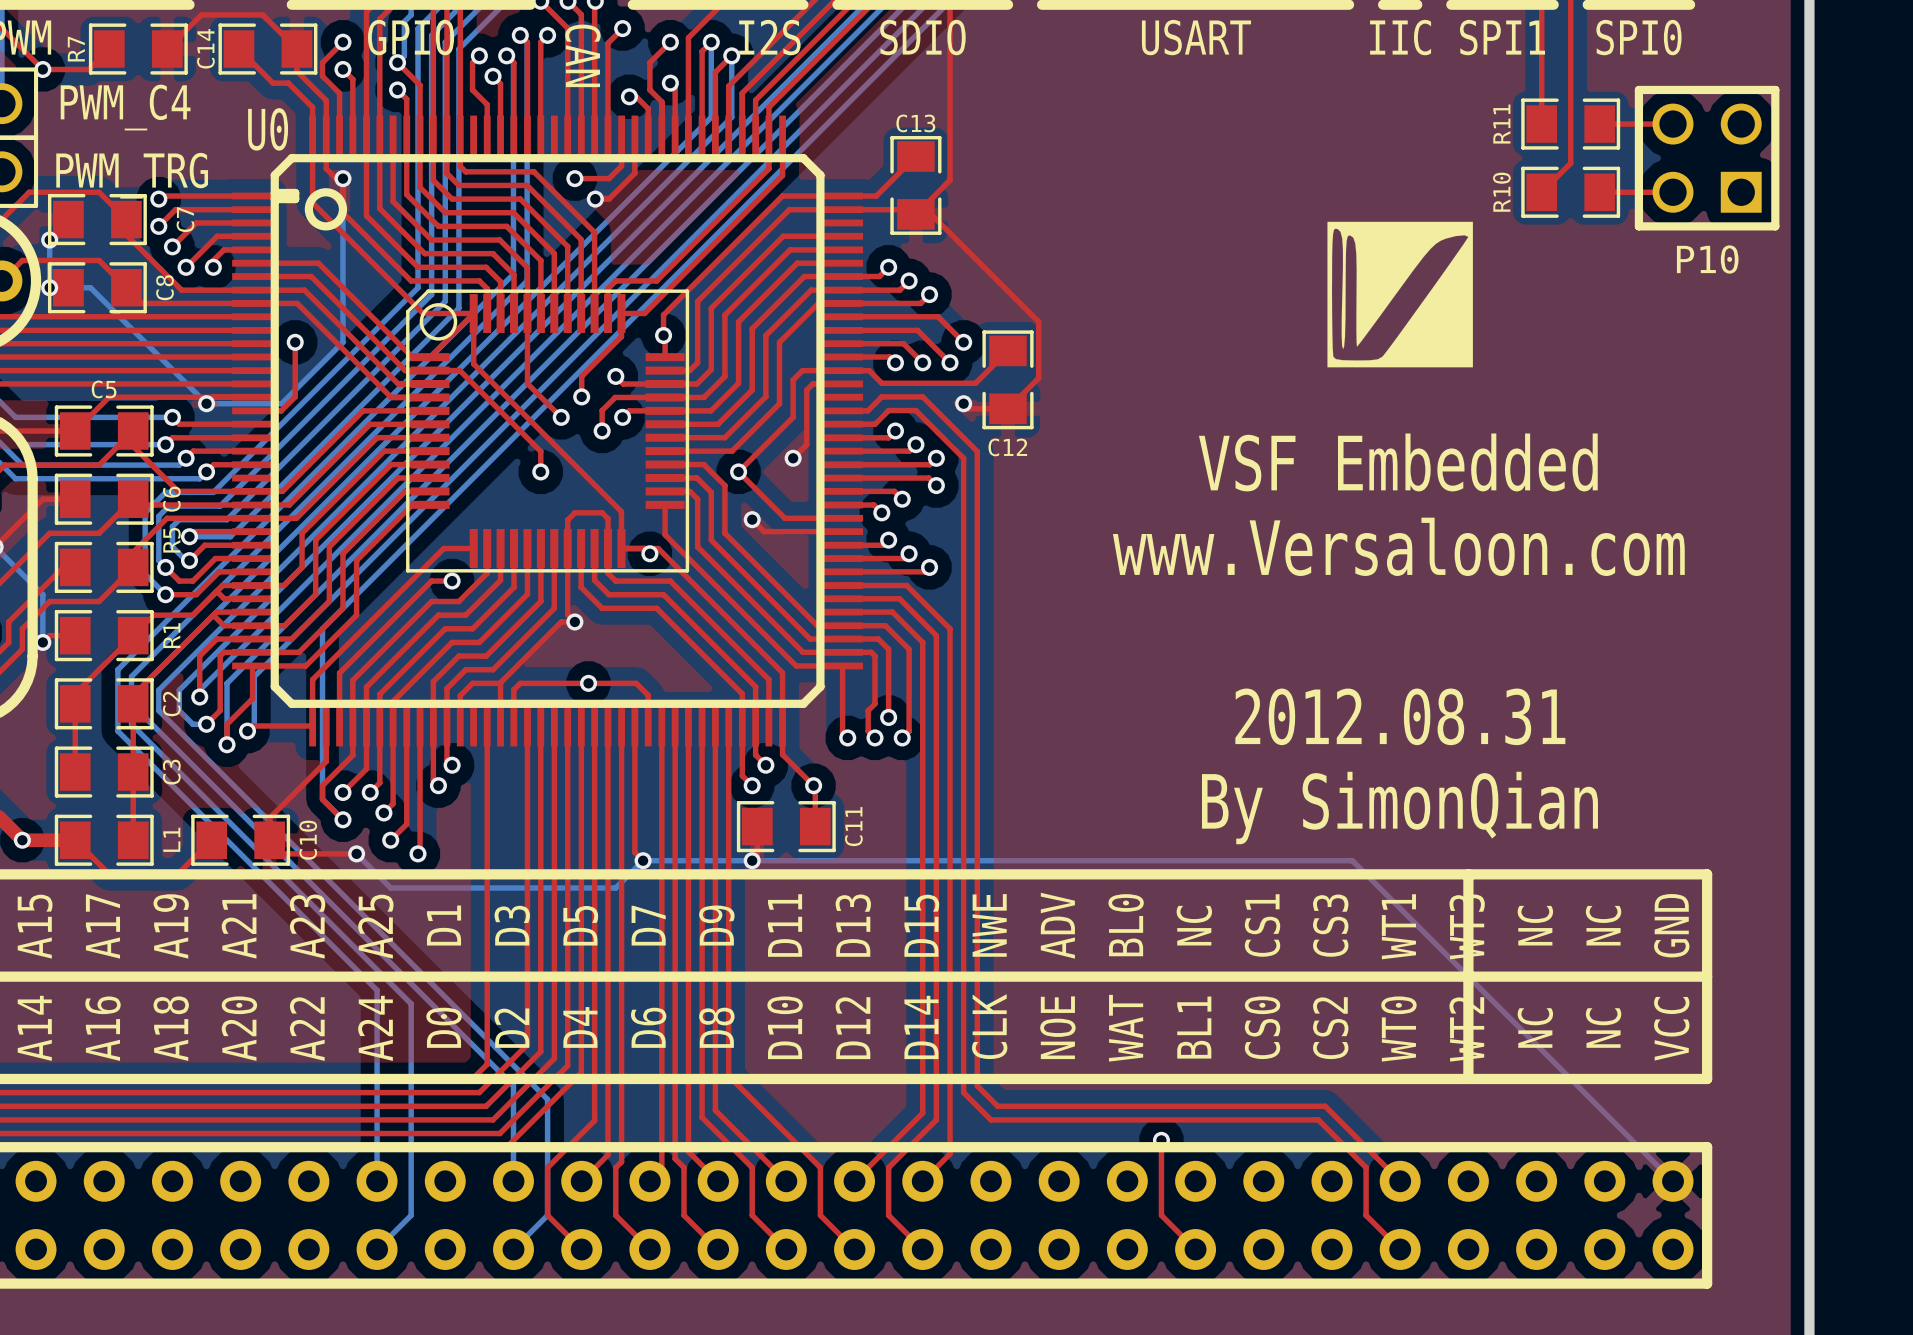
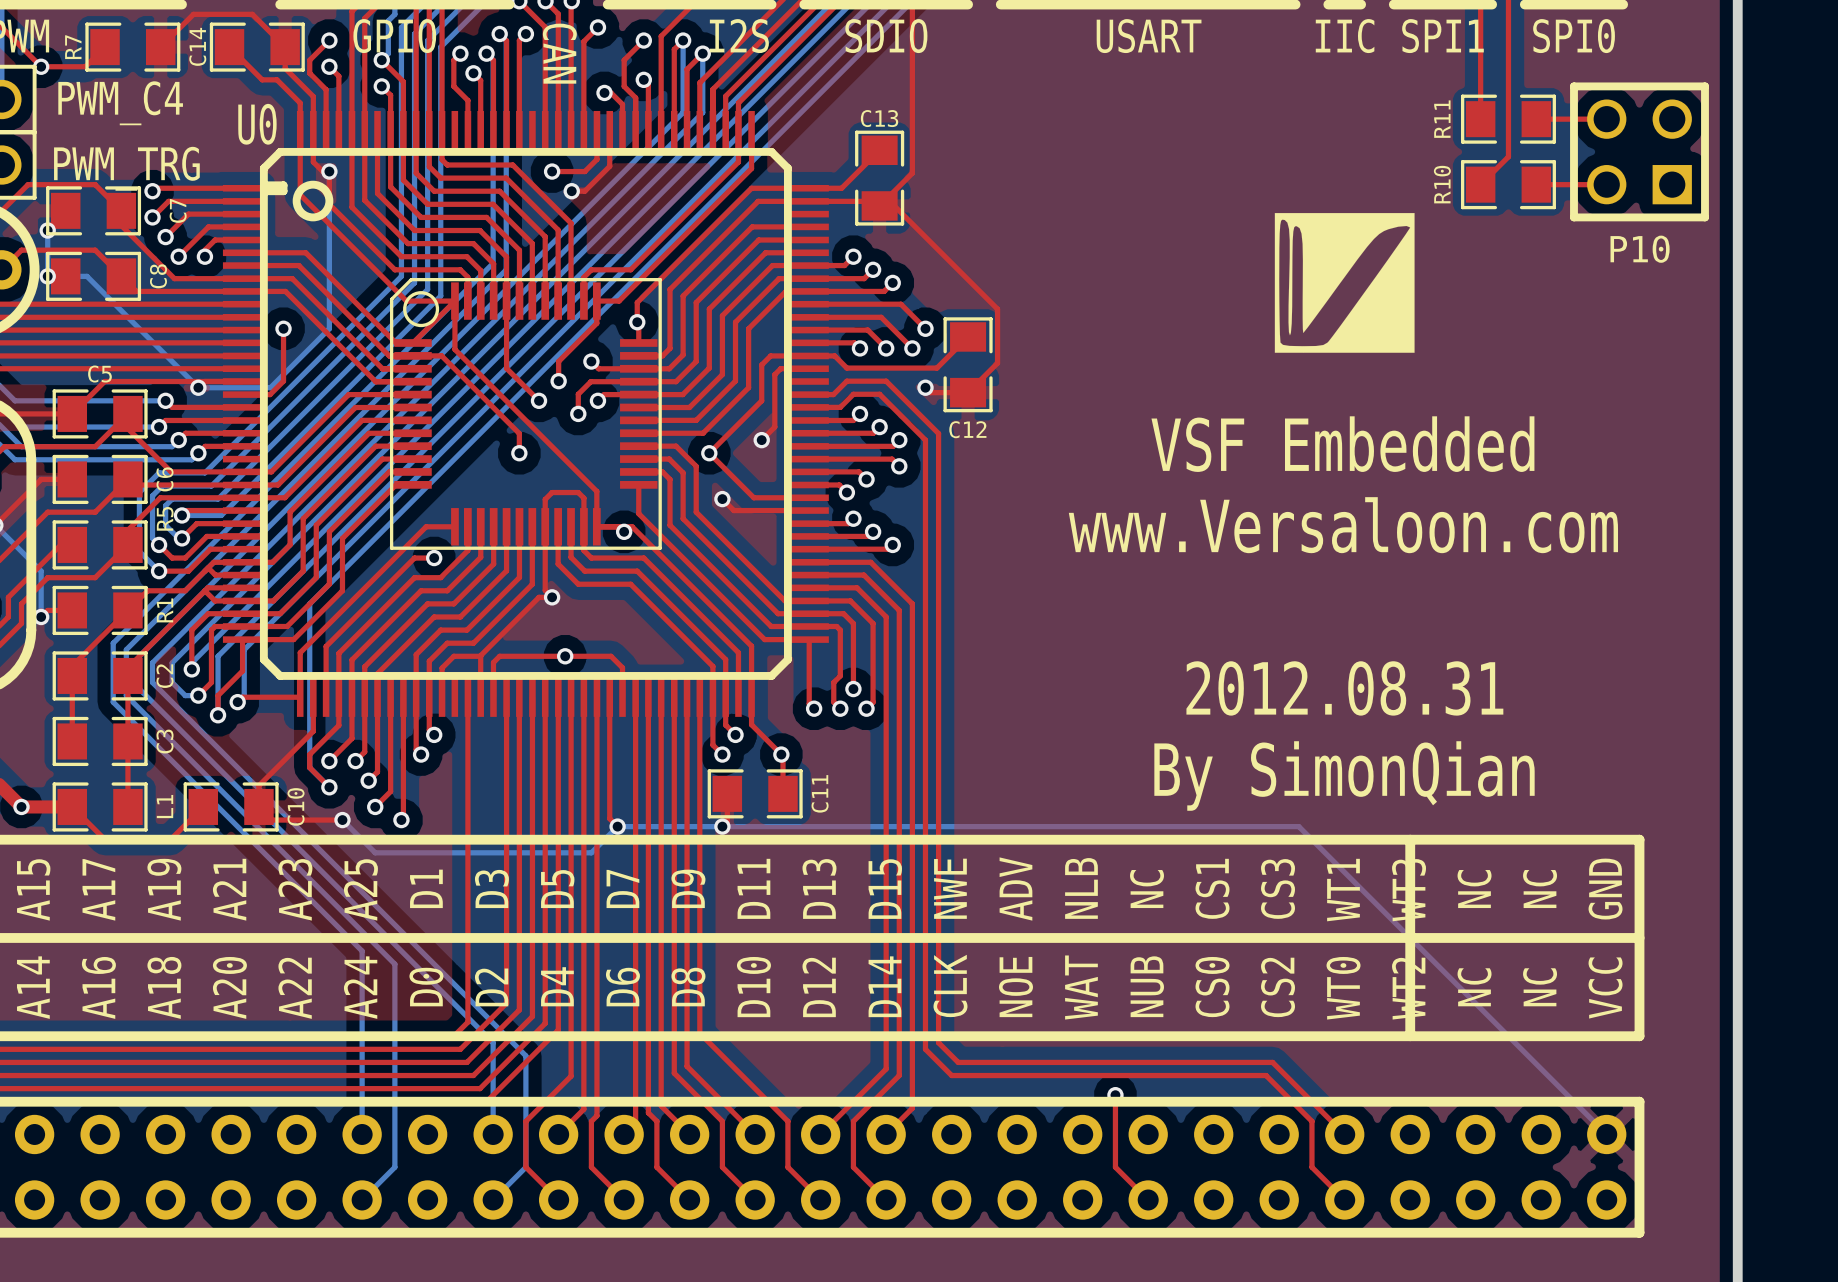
text: BL0 (1126, 925) -> NLB (1081, 888)
text: BL1 (1194, 1027) -> NUB (1147, 986)

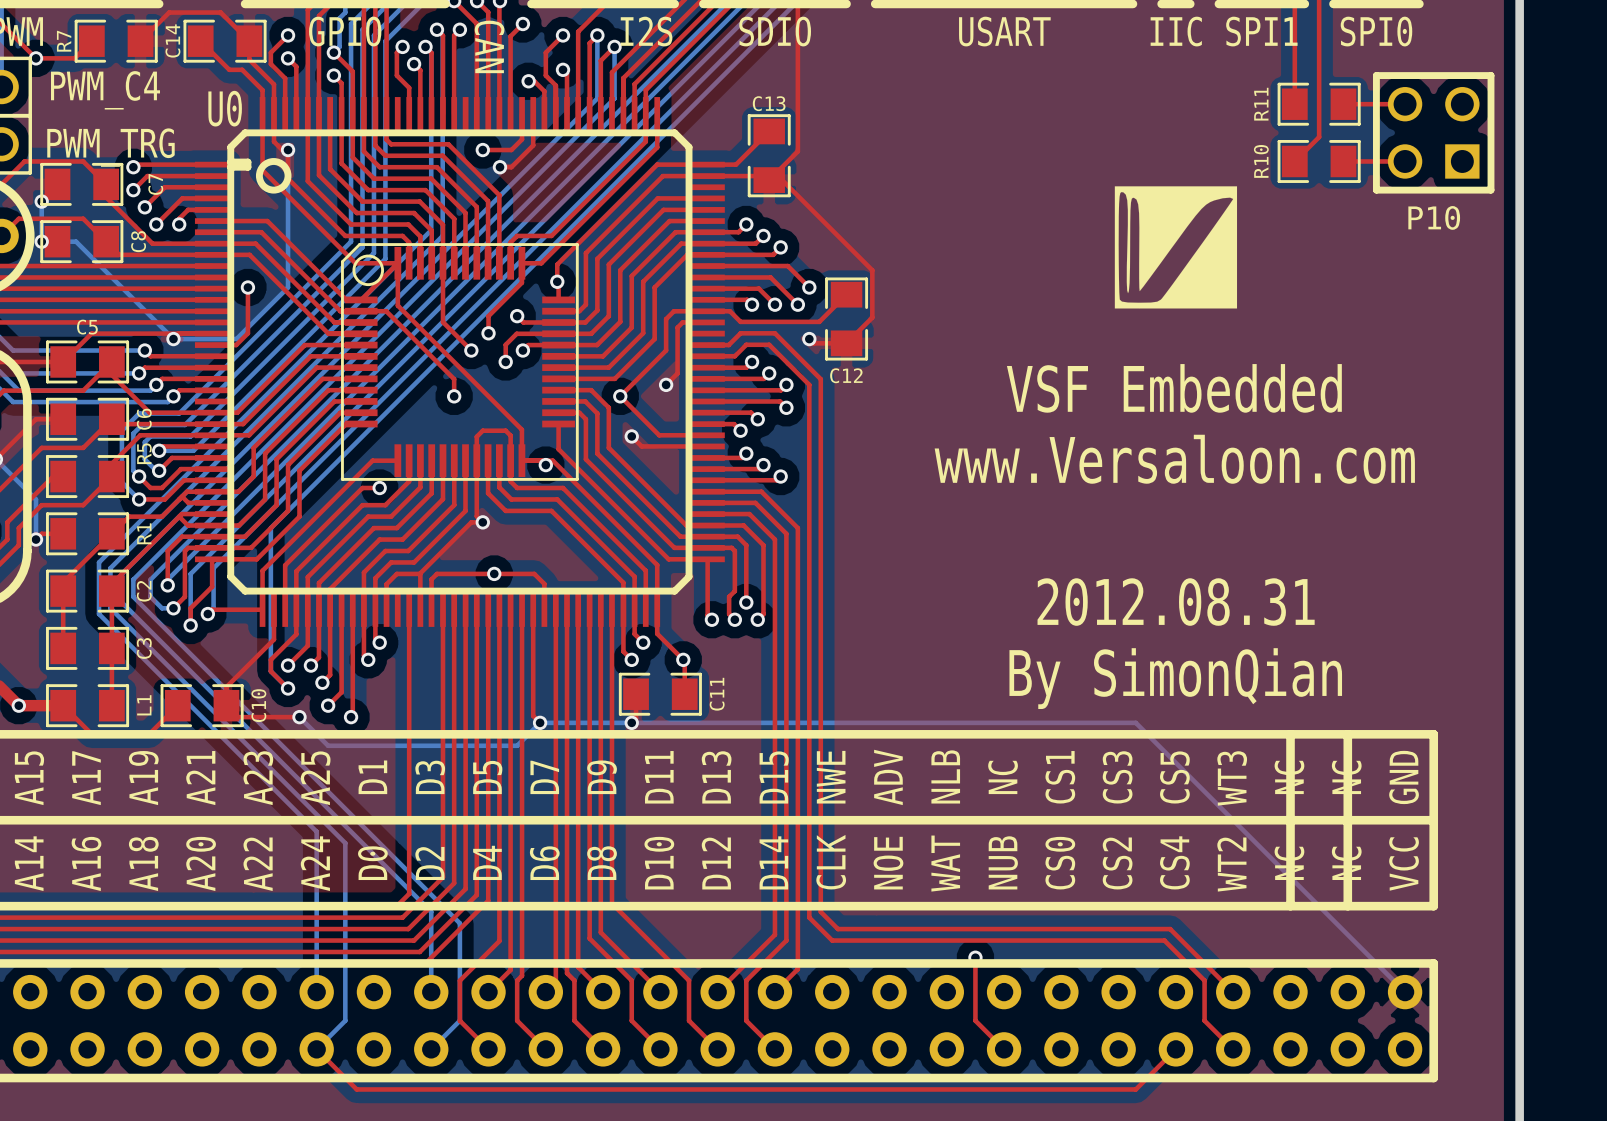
line: (1410, 839) (1410, 1036) -> (1290, 734) (1290, 906)
line: none -> (1347, 734) (1347, 906)
text: WT1 (1343, 890) -> CS5 (1174, 777)
text: WT0 (1343, 988) -> CS4 (1174, 862)
top track: (1272, 1062) (1344, 1134) -> (1112, 929) (1170, 929) (1233, 992)
top track: (1266, 1075) (1311, 1121) (1311, 1167) (1344, 1199) -> (1107, 940) (1164, 940) (1204, 980) (1204, 1020) (1233, 1049)
top track: none -> (316, 1049) (356, 1089) (1135, 1089) (1175, 1049)

